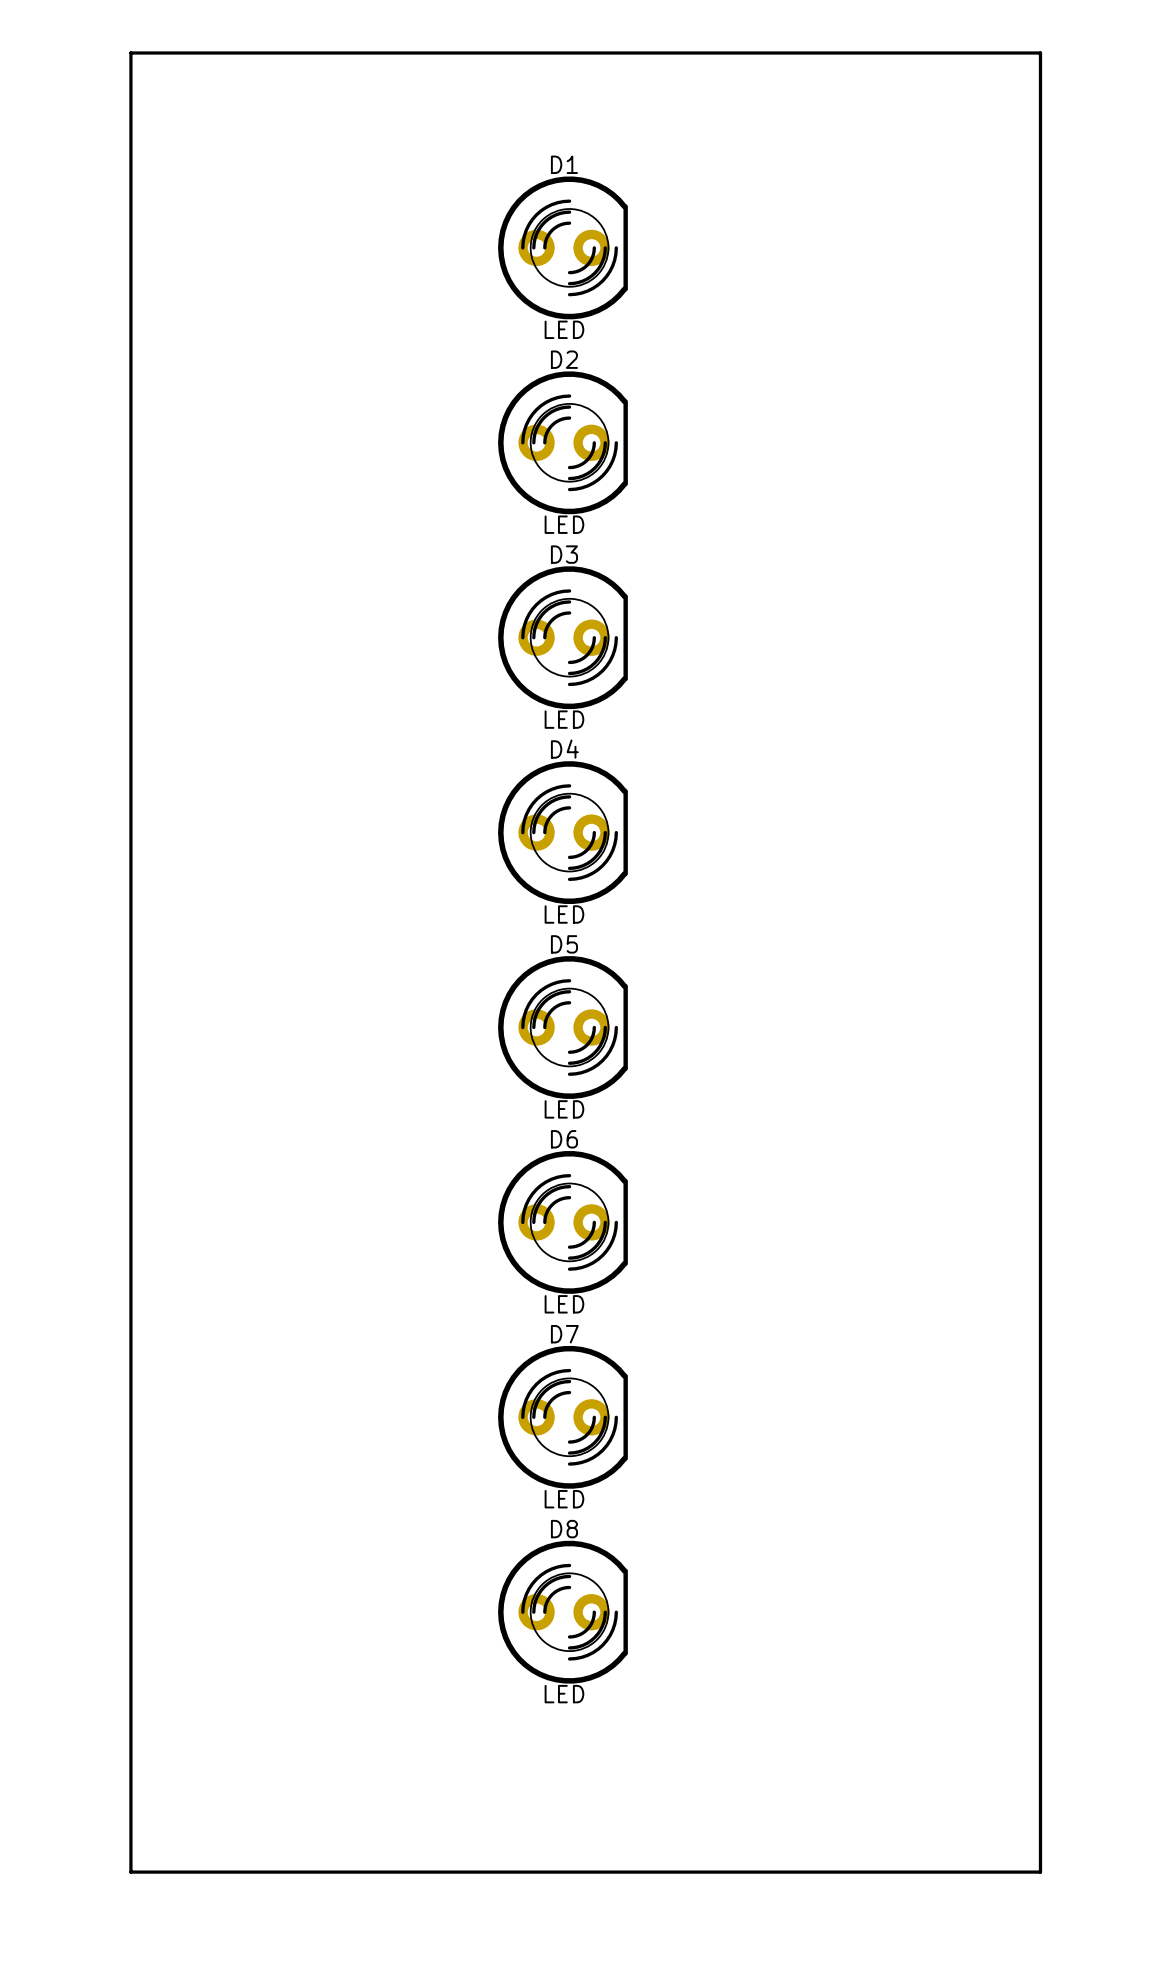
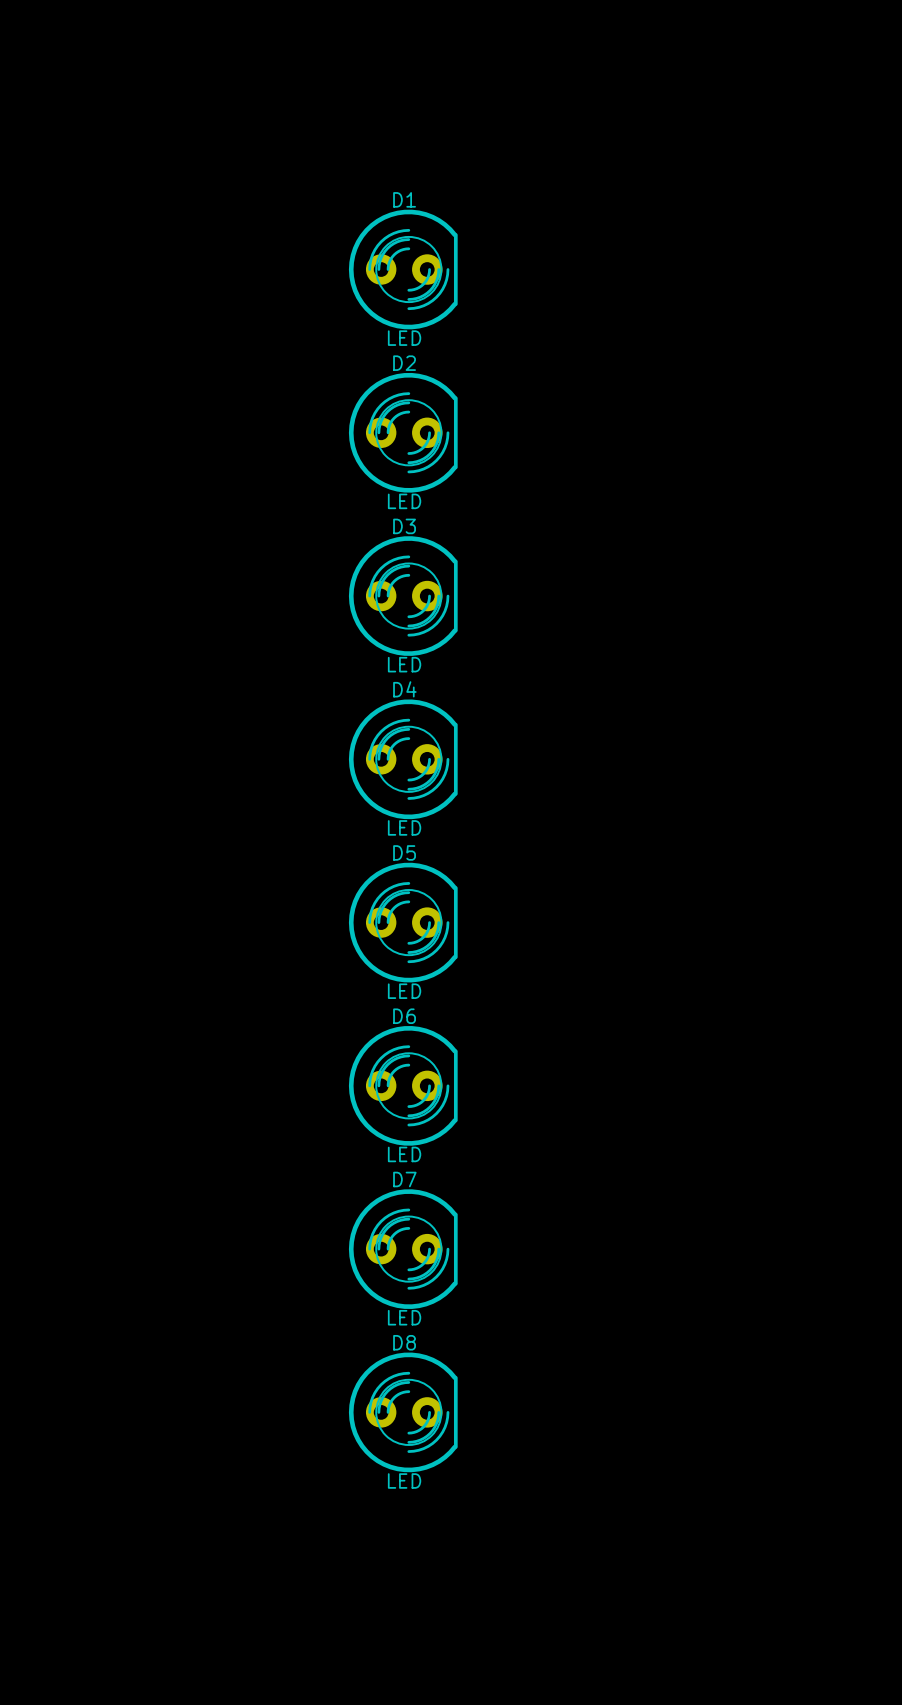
board edge: (130, 53) (130, 1872) (1040, 1872) (1040, 53) (130, 53) -> none

